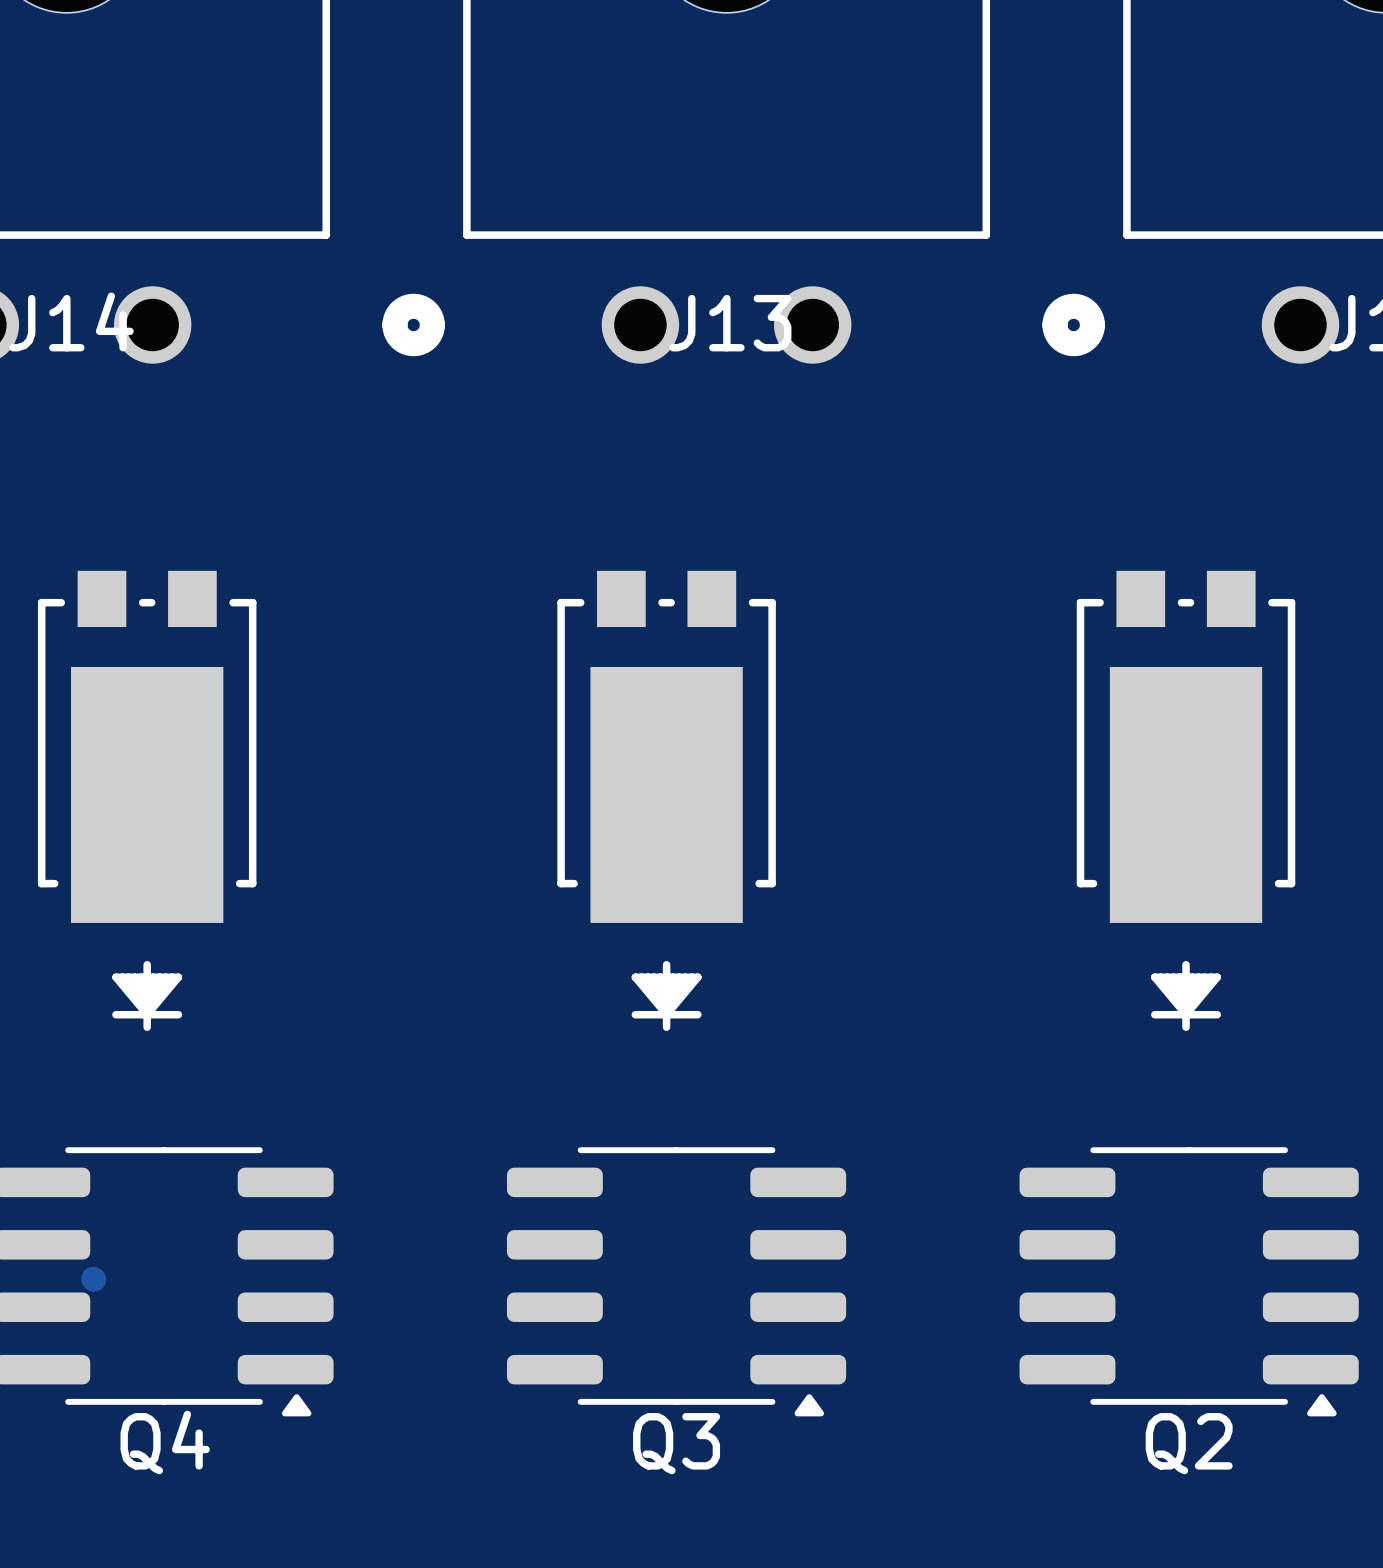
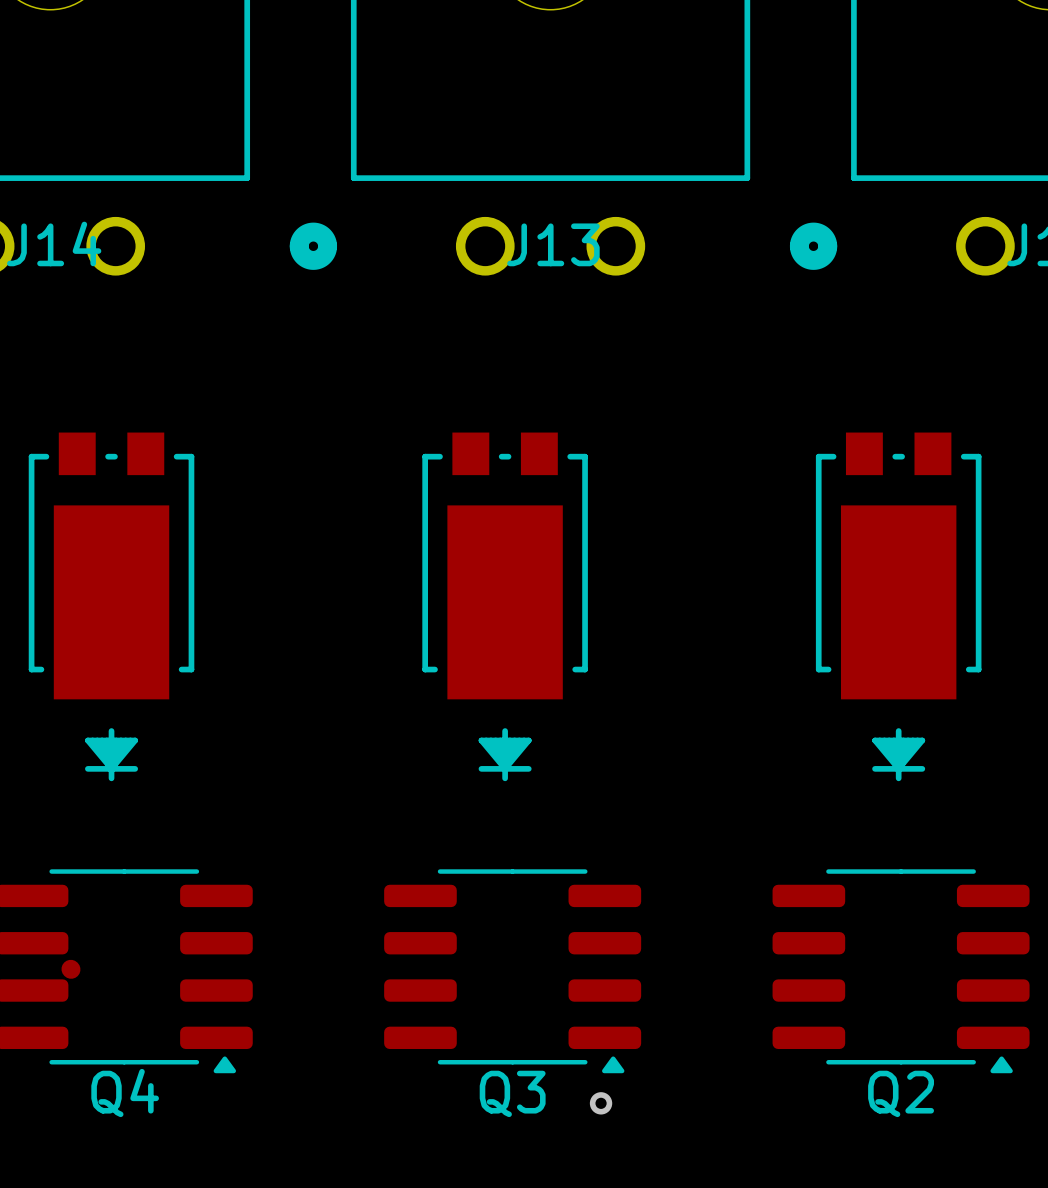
via: none -> (601, 1103)

